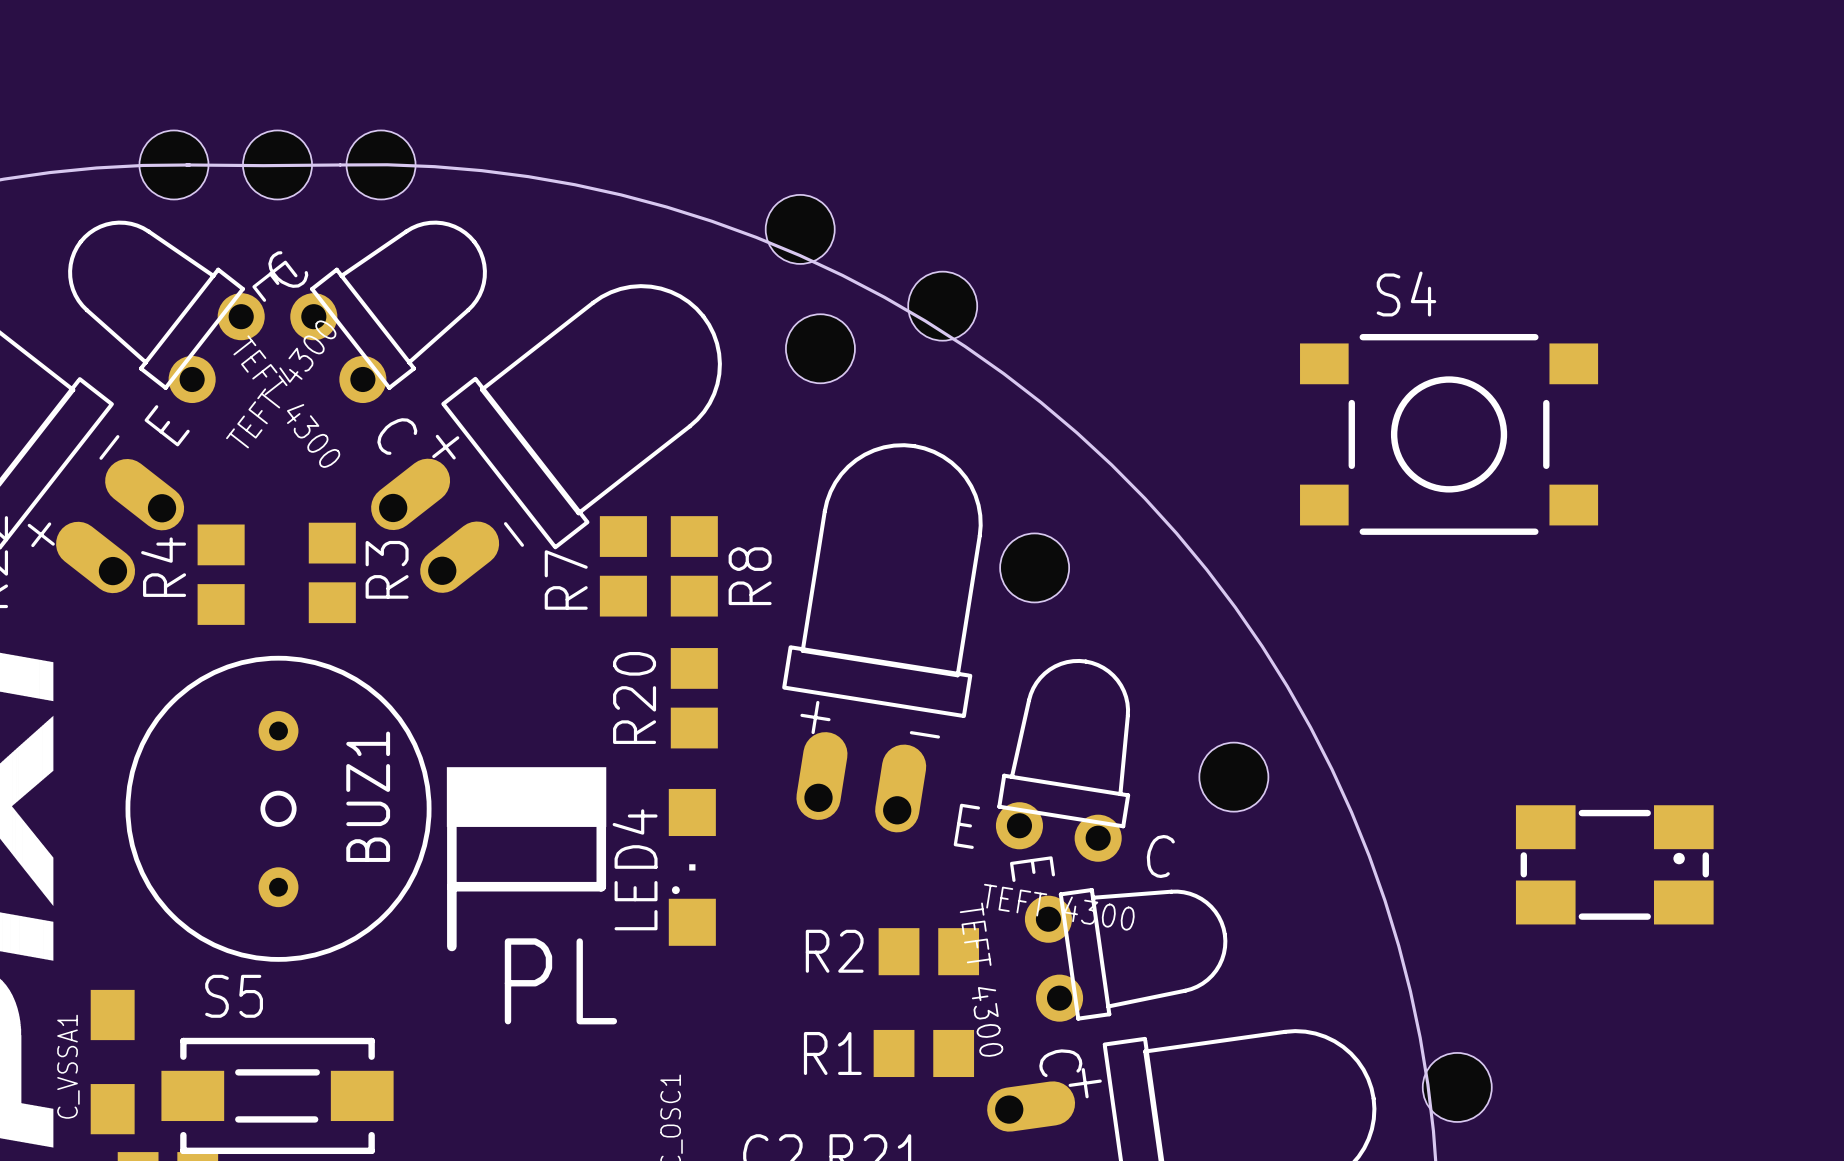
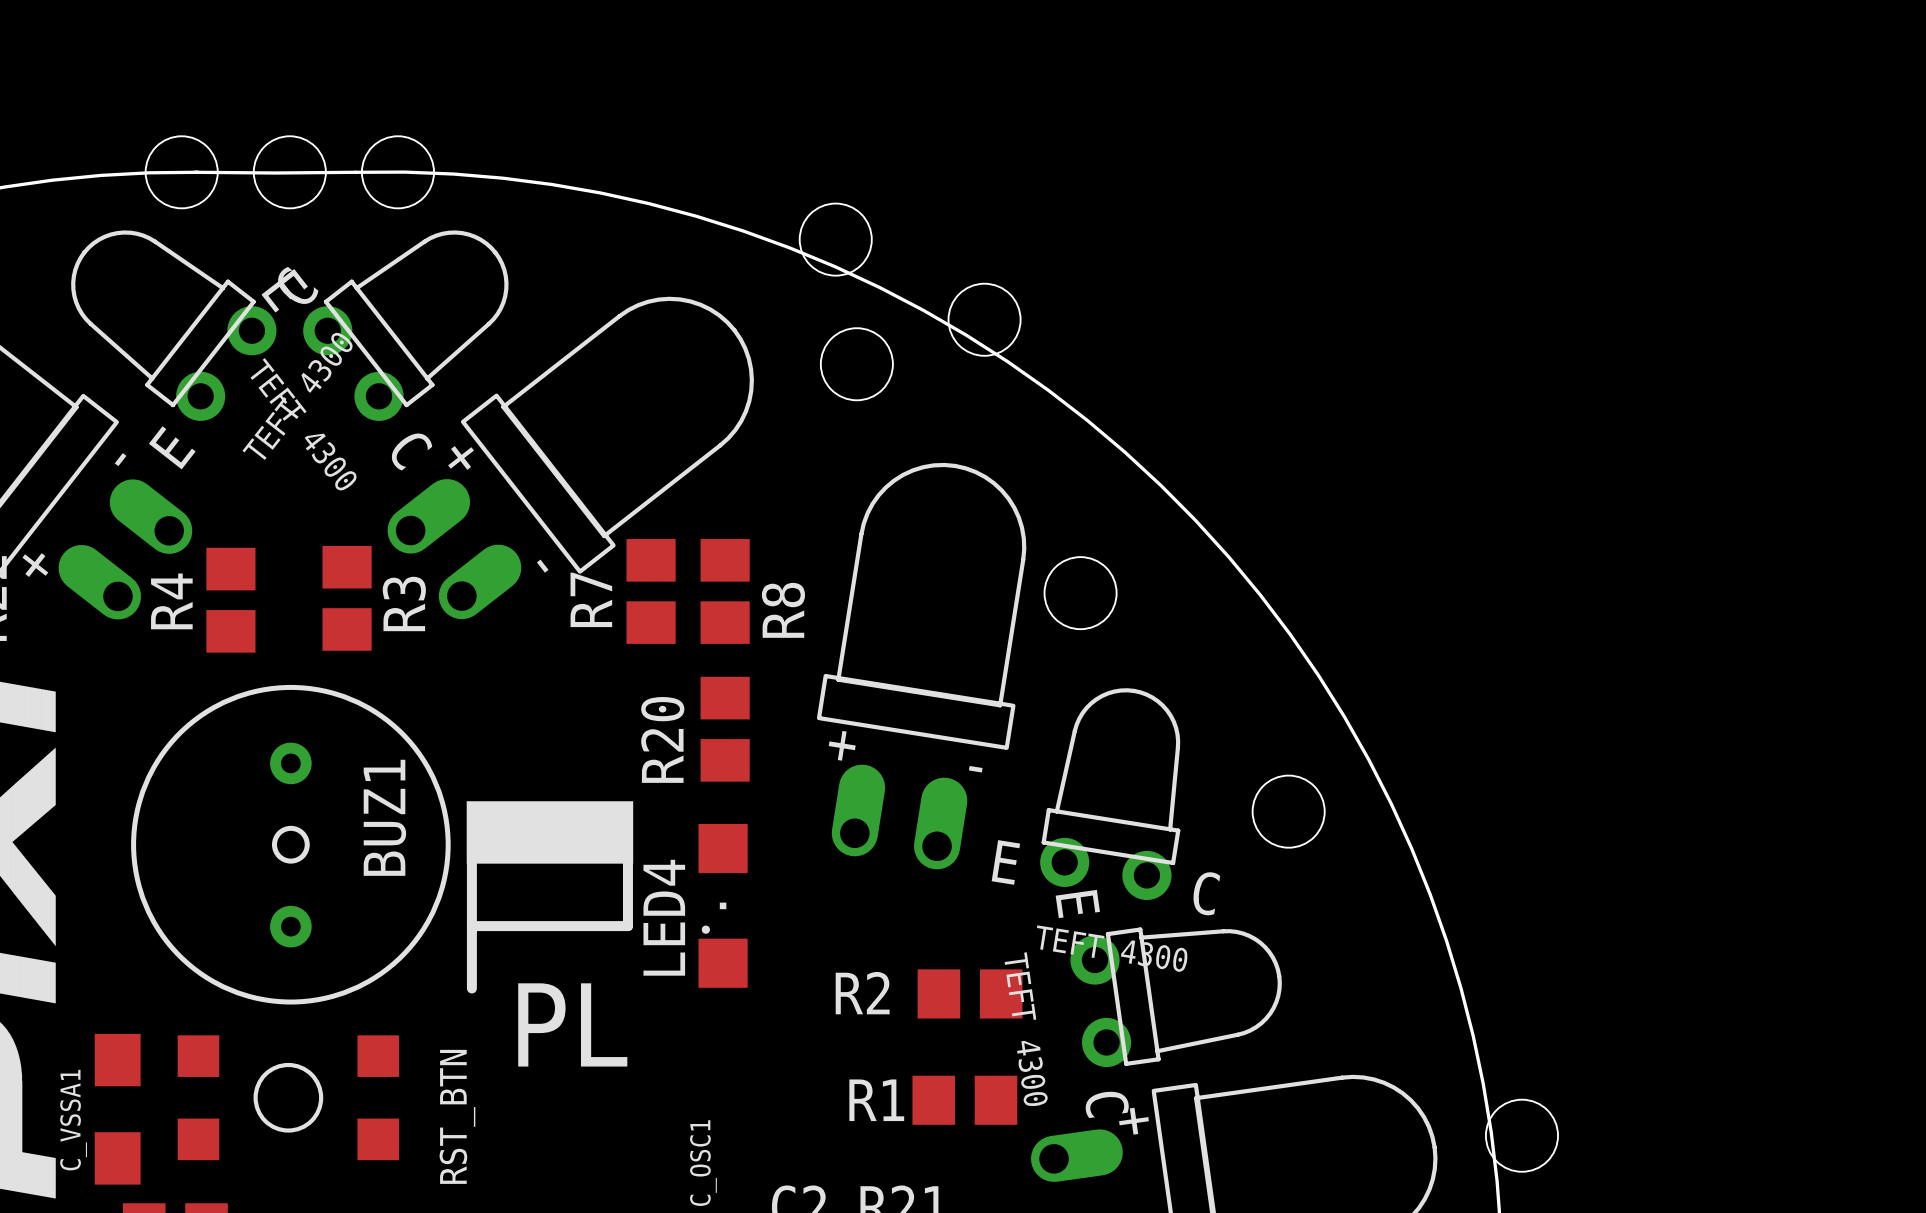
S4: (1449, 434) -> none
part: (1614, 864) -> none
RST_BTN: none -> (288, 1097)
S5: (277, 1095) -> none

